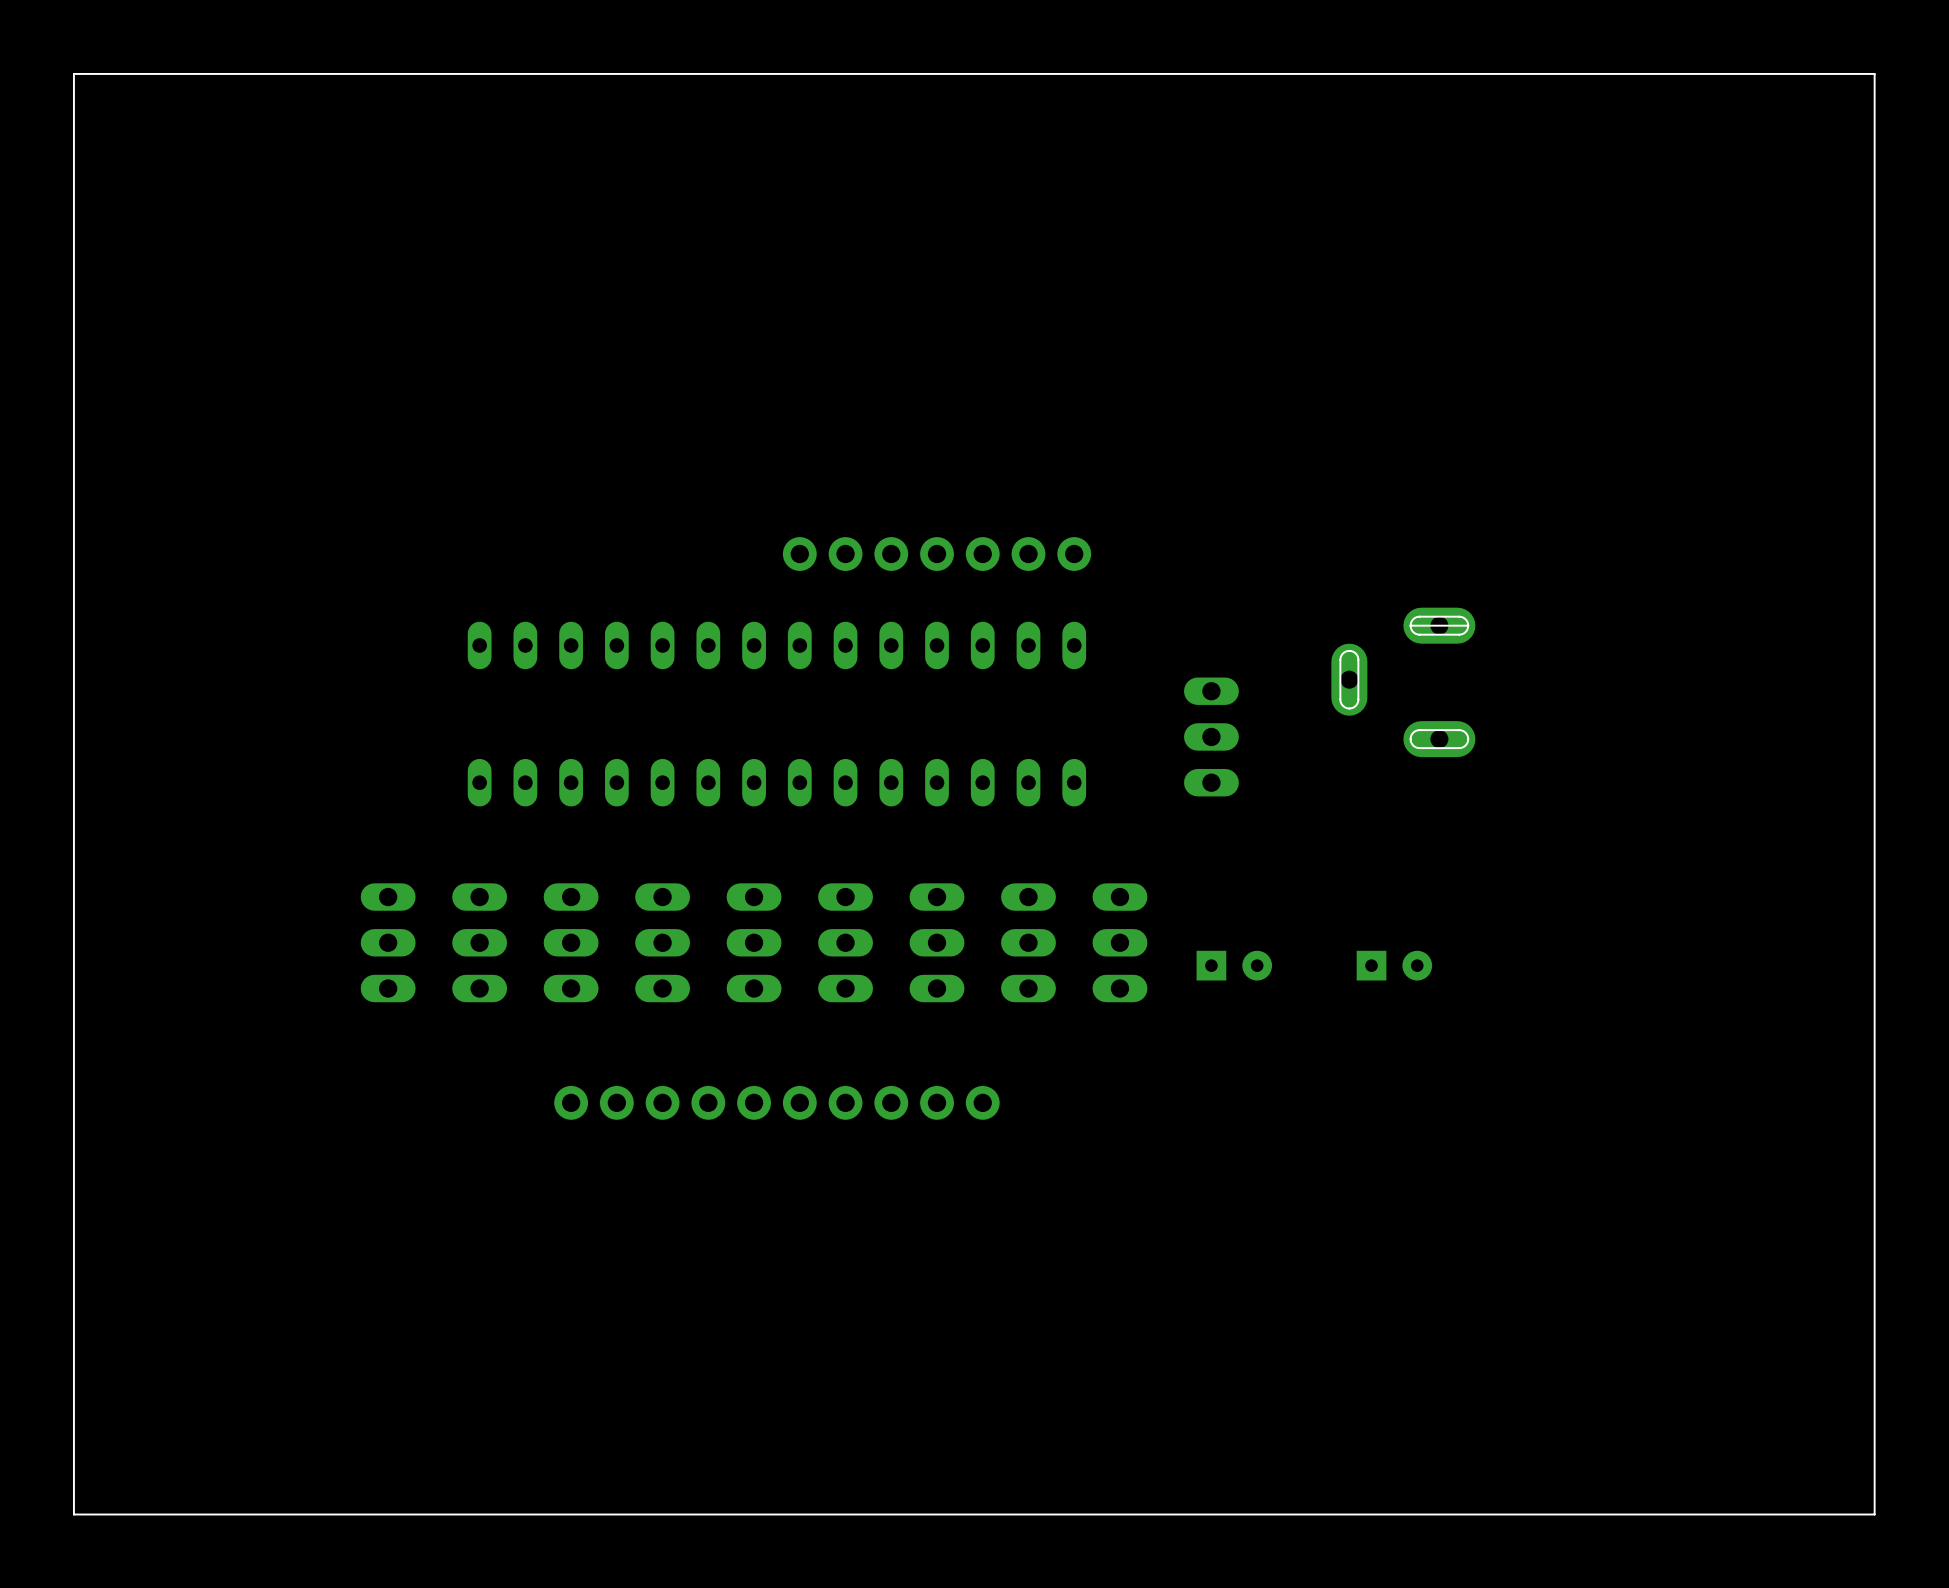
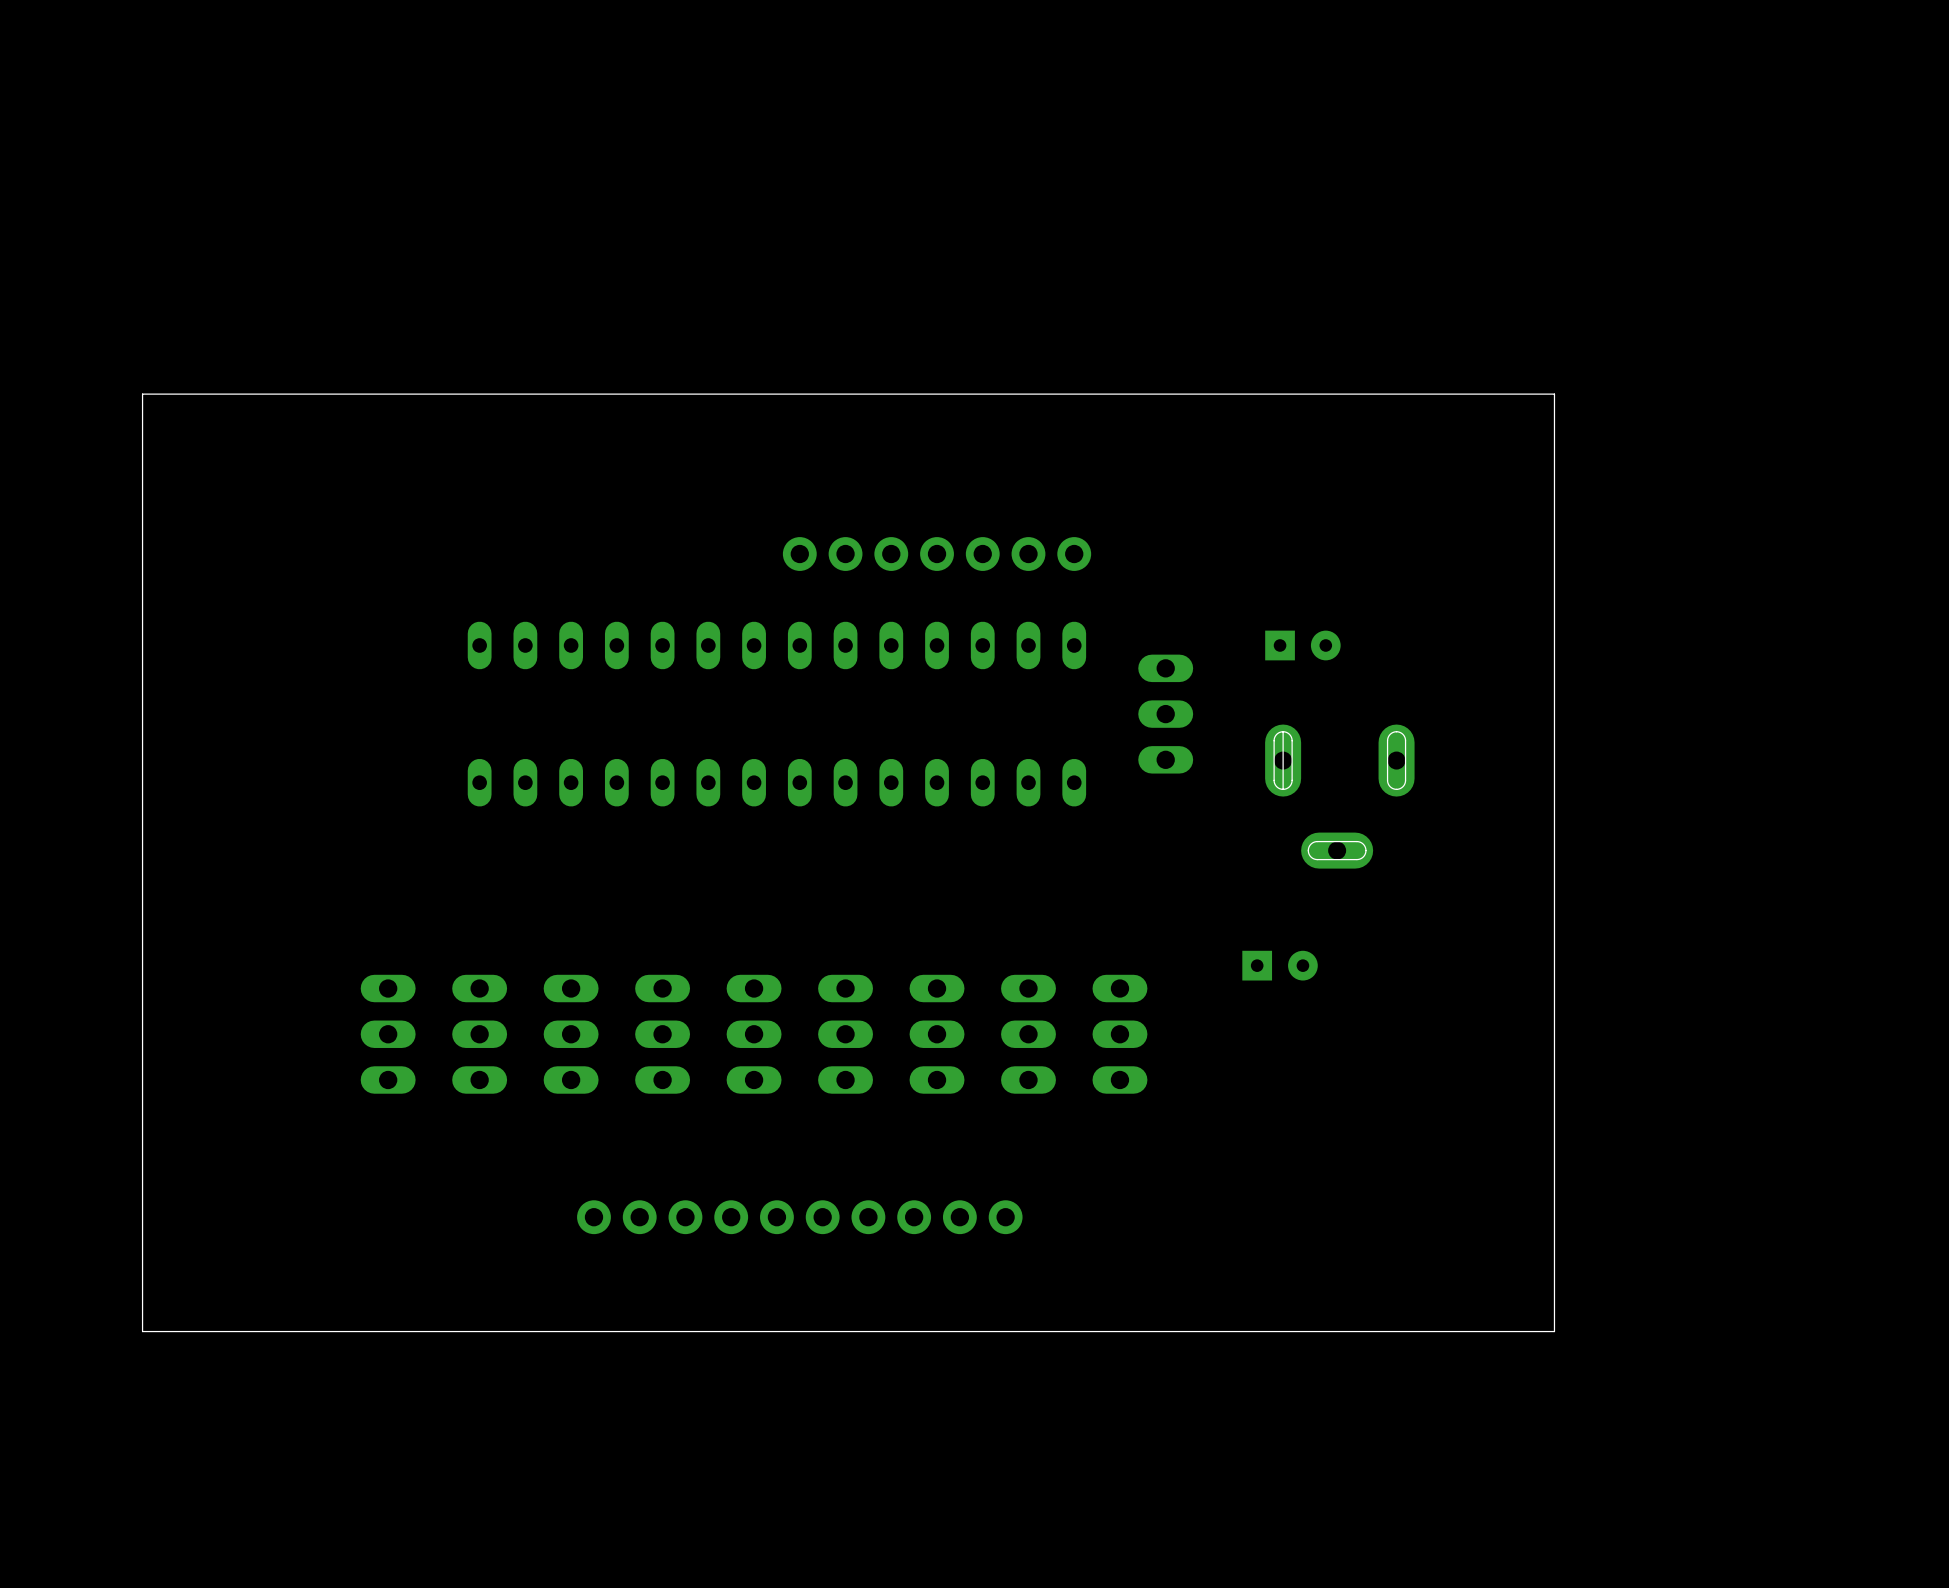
board edge: (1874, 73) (73, 73) (73, 1514) (1874, 1514) (1874, 73) -> (1554, 394) (1554, 1331) (142, 1331) (142, 394) (1554, 394)
part: none -> (1302, 645)
part rotation: 0° (1403, 682) -> 90° counterclockwise (1339, 796)
part position: (1403, 682) -> (1339, 796)
part position: (1211, 736) -> (1165, 714)
part: (388, 942) -> none
part: (479, 942) -> none
part: (571, 942) -> none
part: (662, 942) -> none
part: (754, 942) -> none
part: (845, 942) -> none
part: (937, 942) -> none
part: (1028, 942) -> none
part: (1119, 942) -> none
part position: (1234, 965) -> (1280, 965)
part: (1394, 965) -> none
part: none -> (388, 1034)
part: none -> (479, 1034)
part: none -> (571, 1034)
part: none -> (662, 1034)
part: none -> (754, 1034)
part: none -> (845, 1034)
part: none -> (937, 1034)
part: none -> (1028, 1034)
part: none -> (1119, 1034)
part position: (776, 1102) -> (799, 1217)

